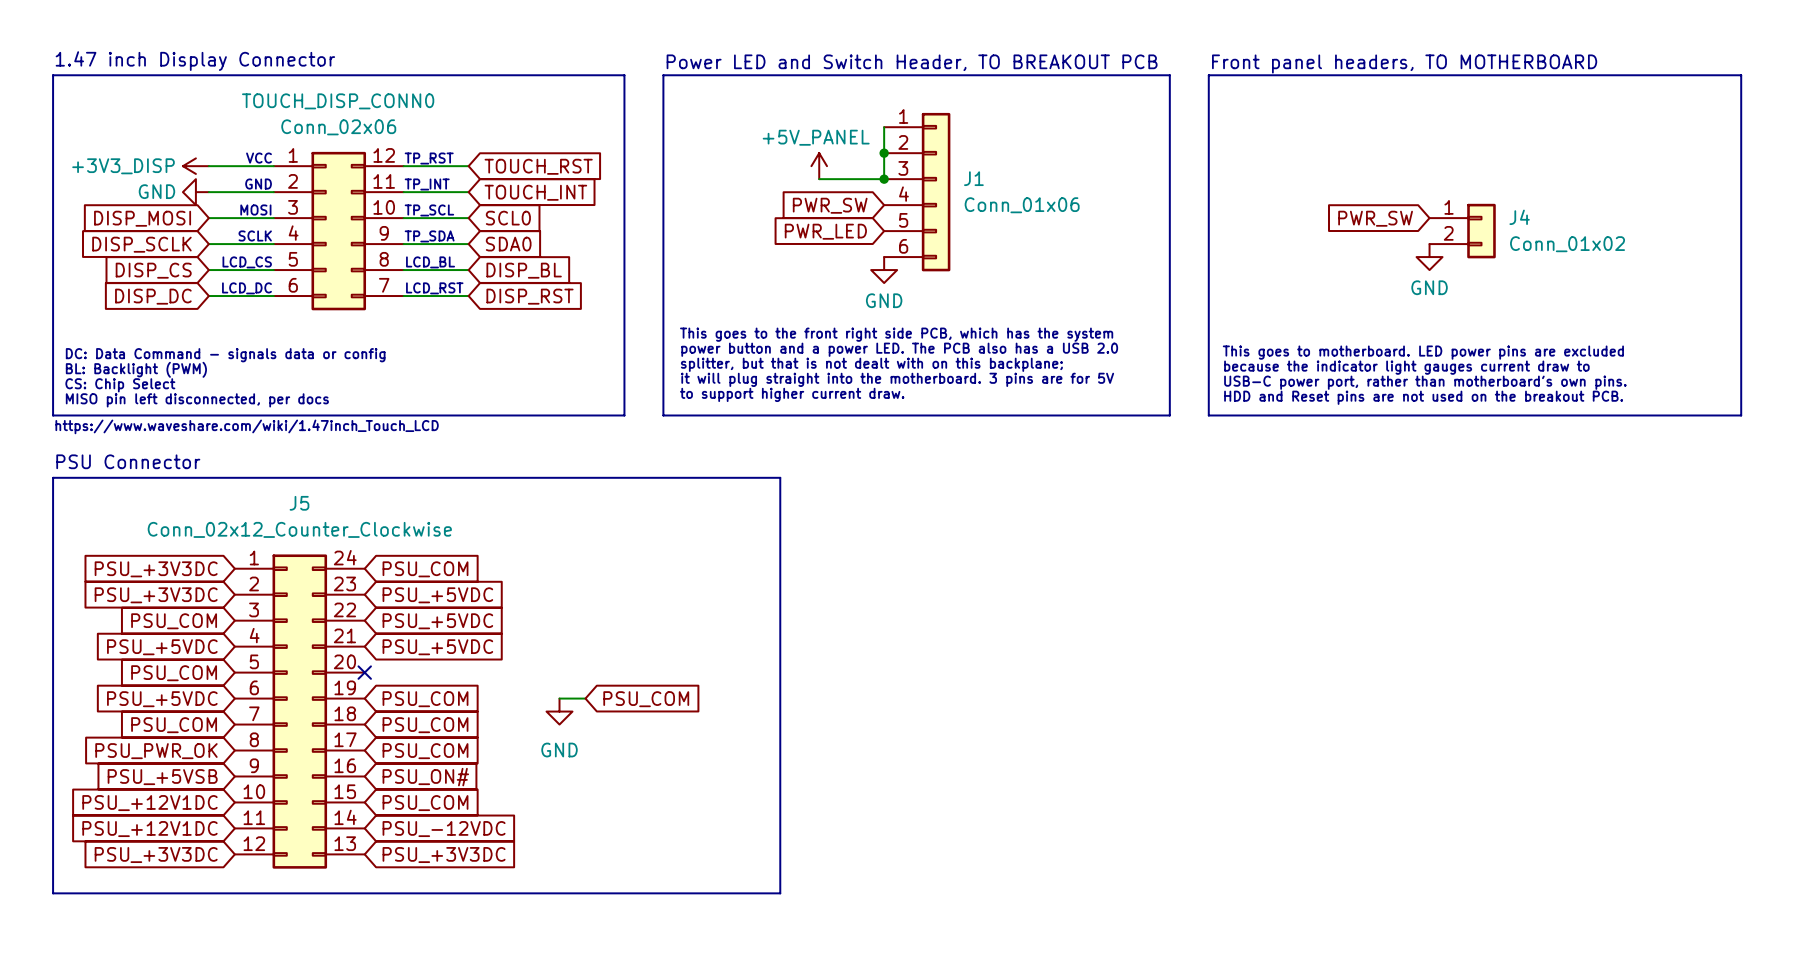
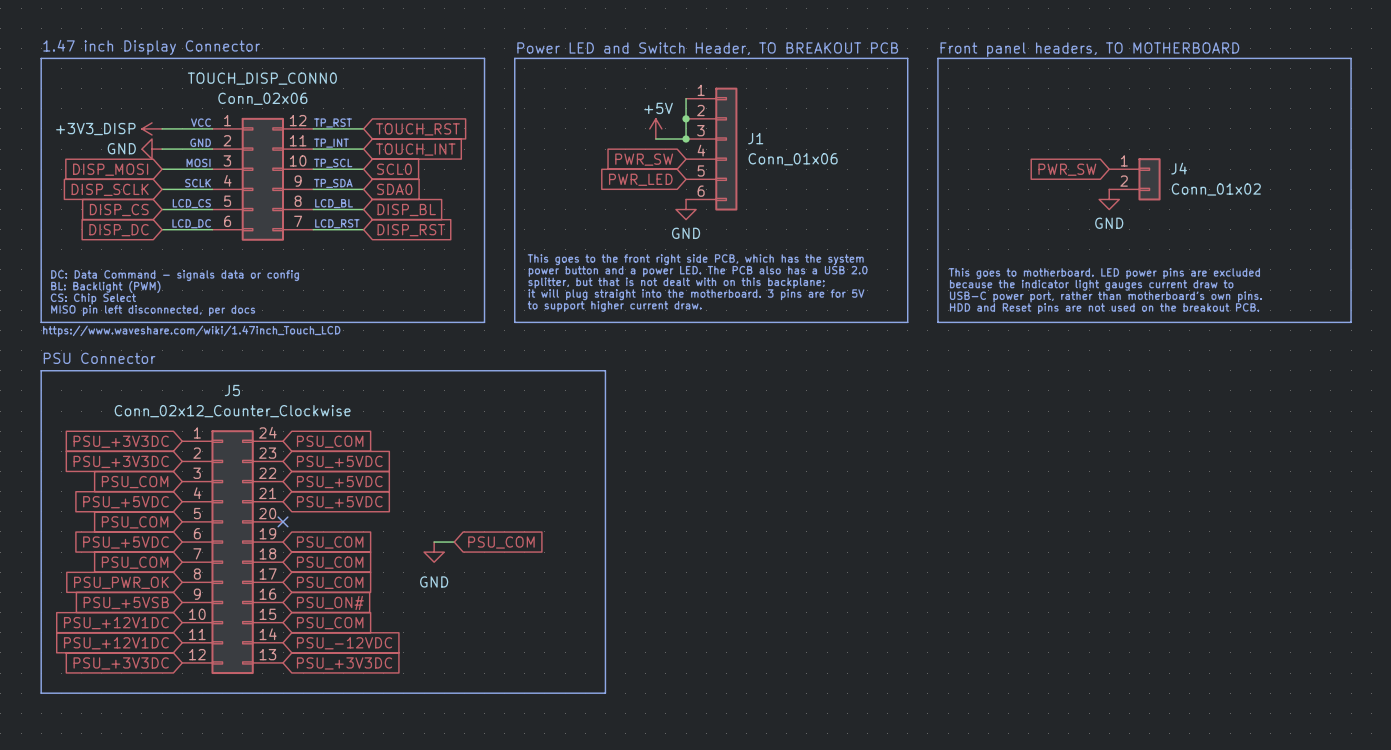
power symbol: +5V_PANEL (819, 166) -> none
power symbol: none -> +5V (655, 128)
wire: (819, 179) (845, 179) -> none

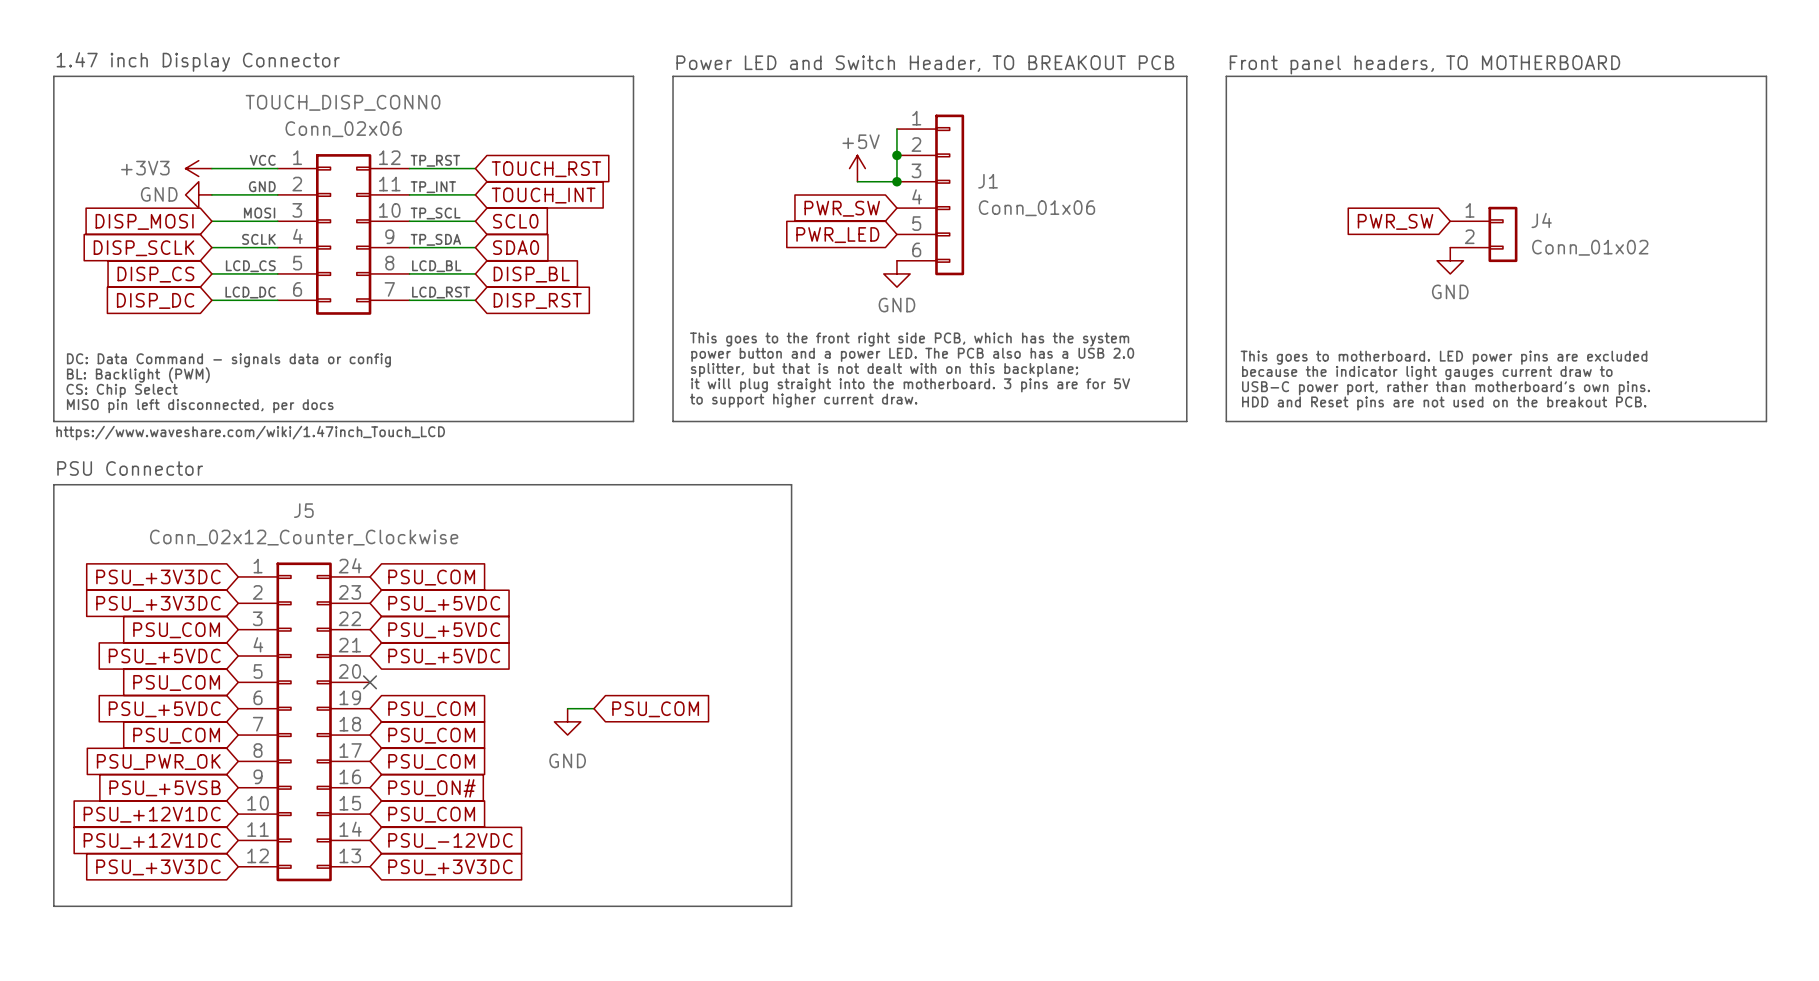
power symbol: +3V3_DISP (152, 128) -> +3V3 (198, 168)

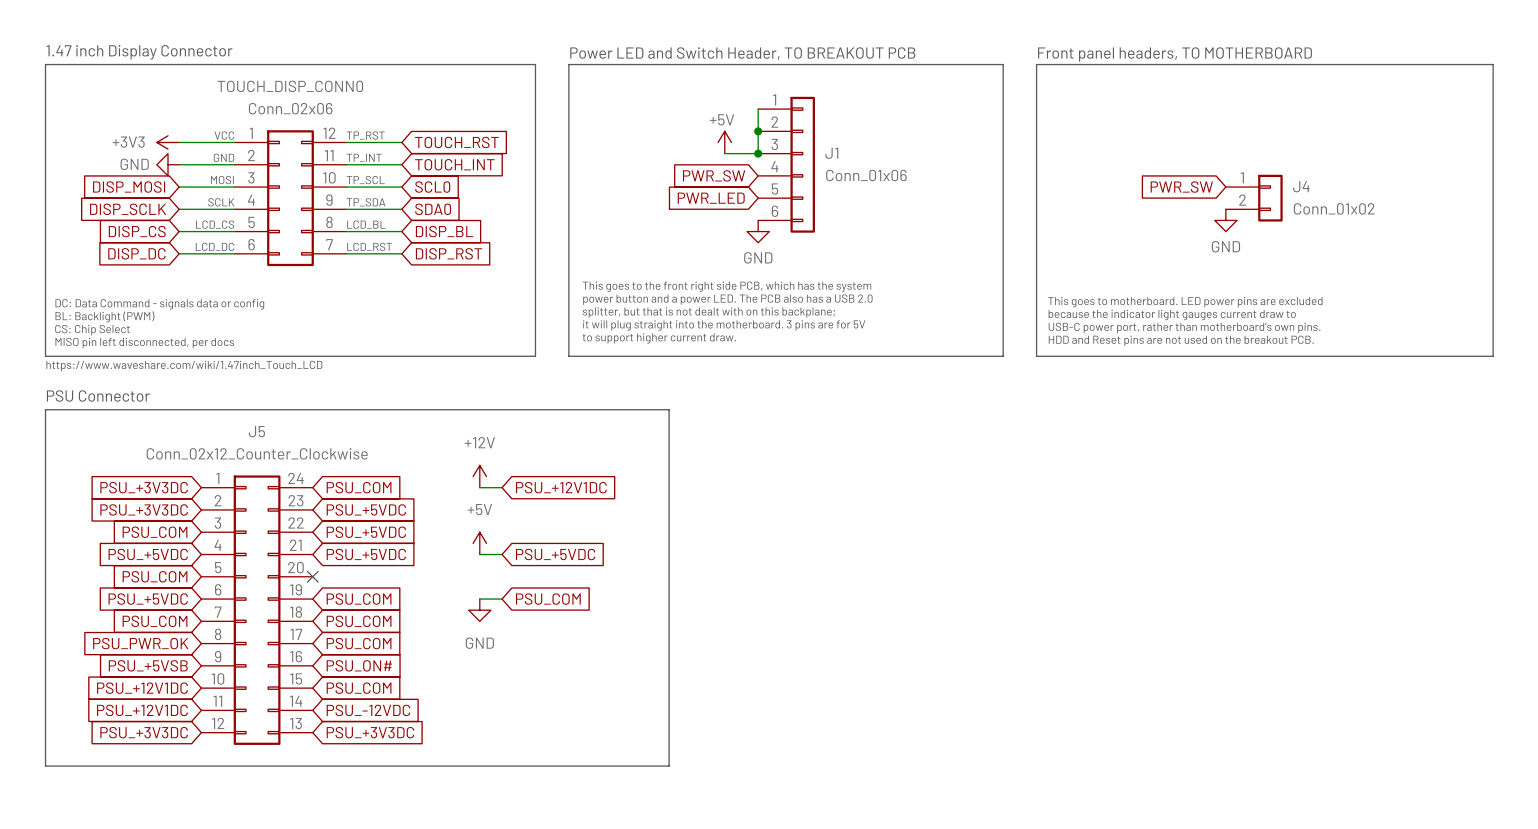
power symbol: none -> +12V (479, 476)
wire: none -> (479, 487) (502, 487)
global label: none -> PSU_+12V1DC (561, 487)
power symbol: none -> +5V (479, 543)
wire: none -> (479, 554) (502, 554)
global label: none -> PSU_+5VDC (555, 554)

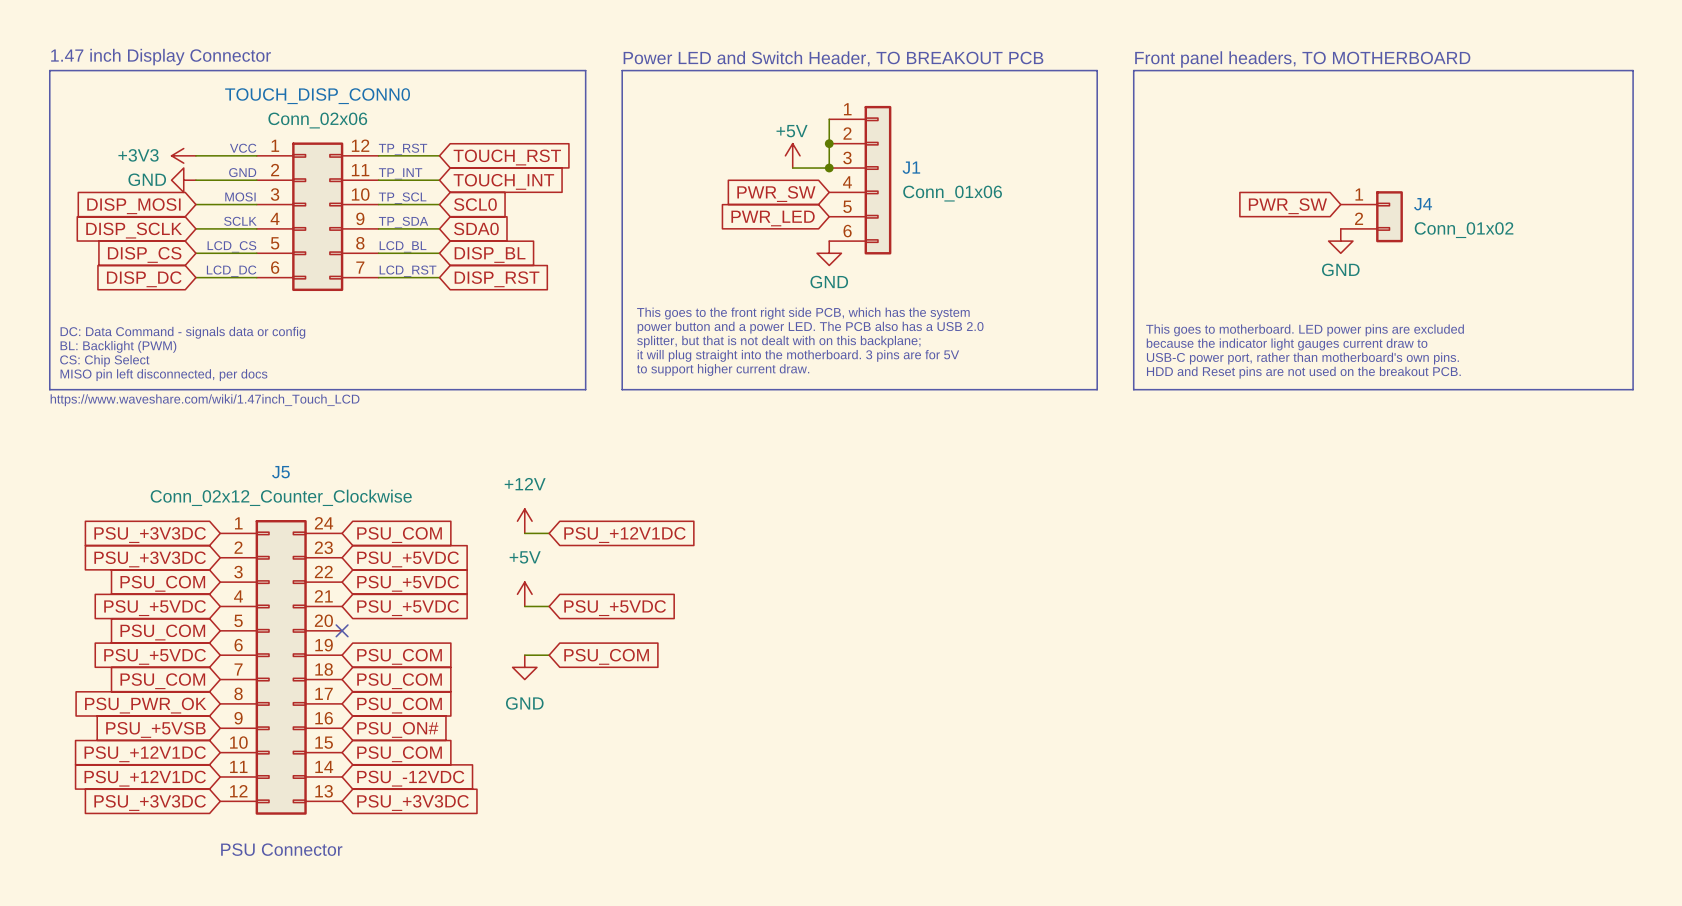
text: PSU Connector (98, 396) -> none
line: (45, 409) (669, 409) (669, 766) (45, 766) (45, 409) -> none
text: none -> PSU Connector (281, 849)

